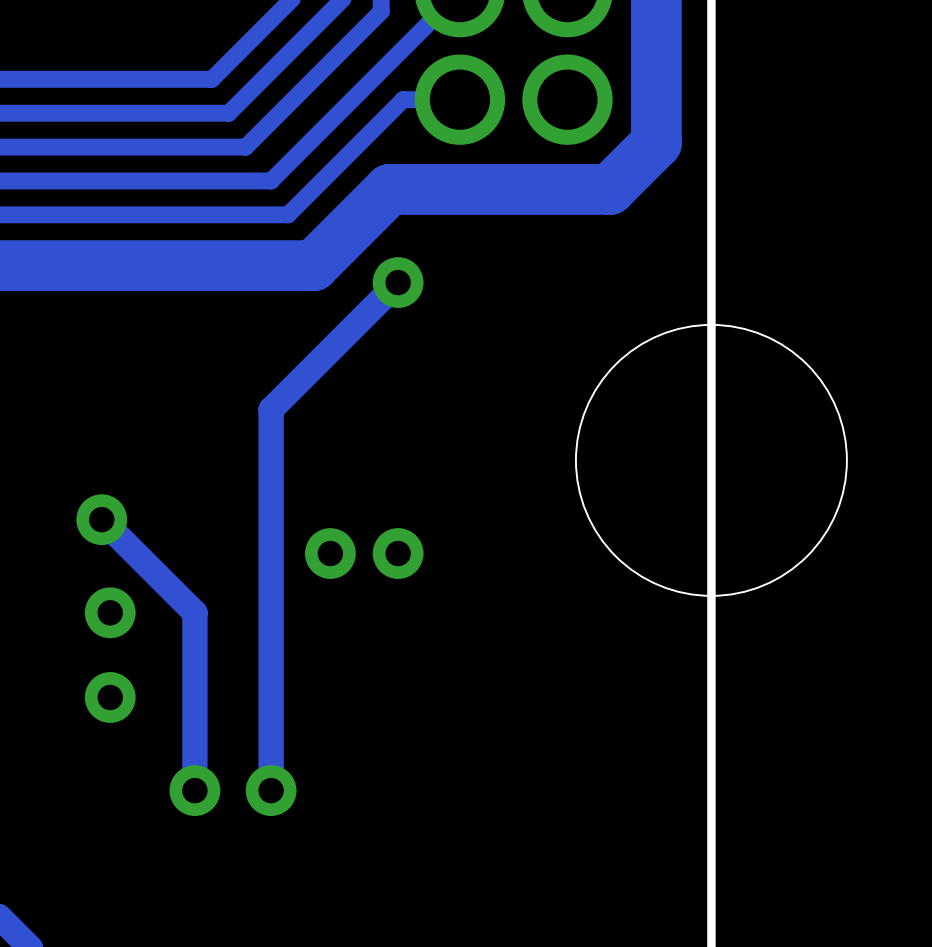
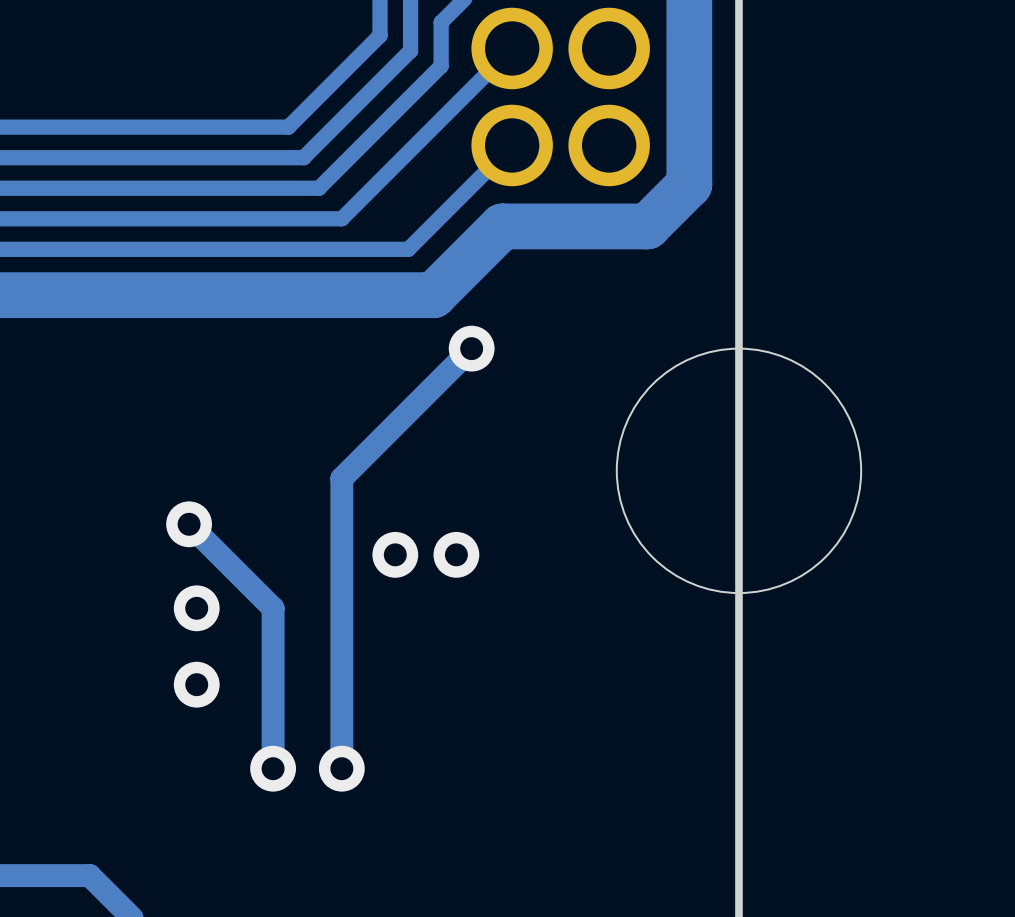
track: (459, 99) (403, 99) (288, 214) -> (512, 145) (408, 249) (357, 249)
track: (448, 189) (389, 189) (313, 265) -> (502, 226) (433, 295) (380, 295)
track: (398, 282) (271, 409) (271, 468) -> (471, 348) (341, 478)
via position: (398, 282) -> (471, 348)

